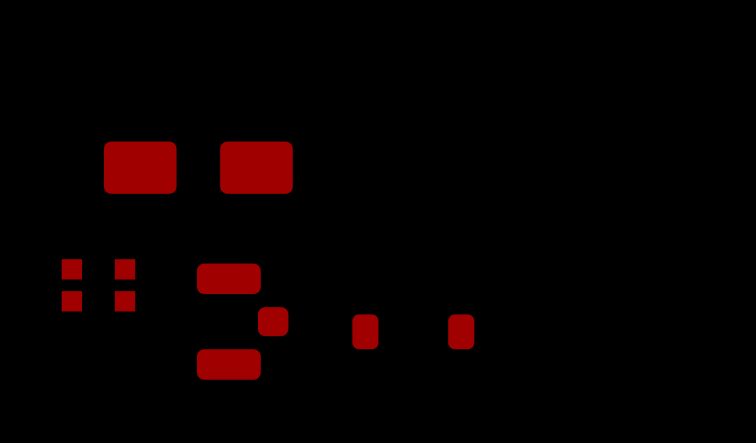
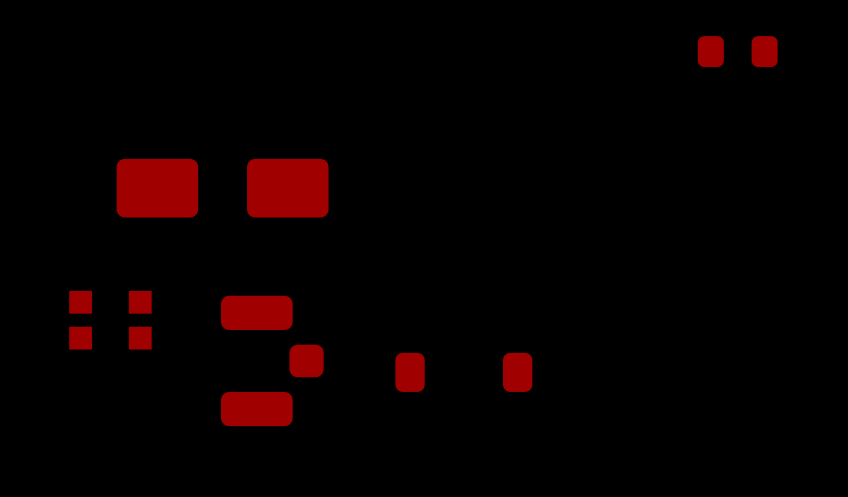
part: none -> (737, 51)

